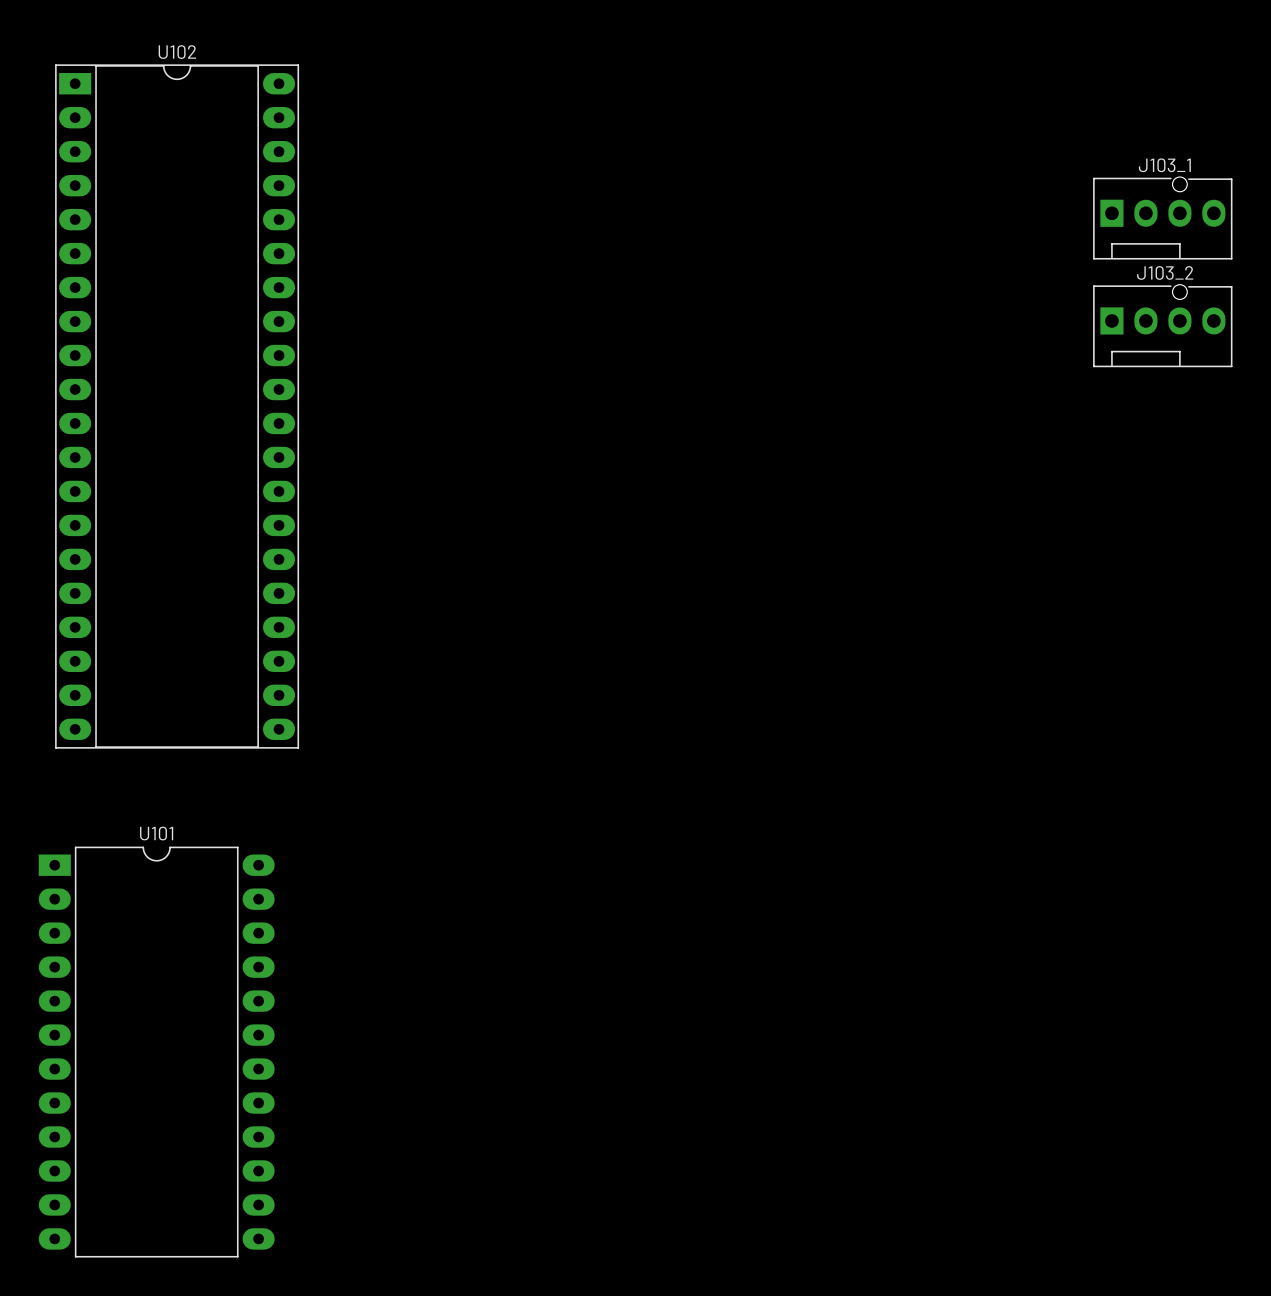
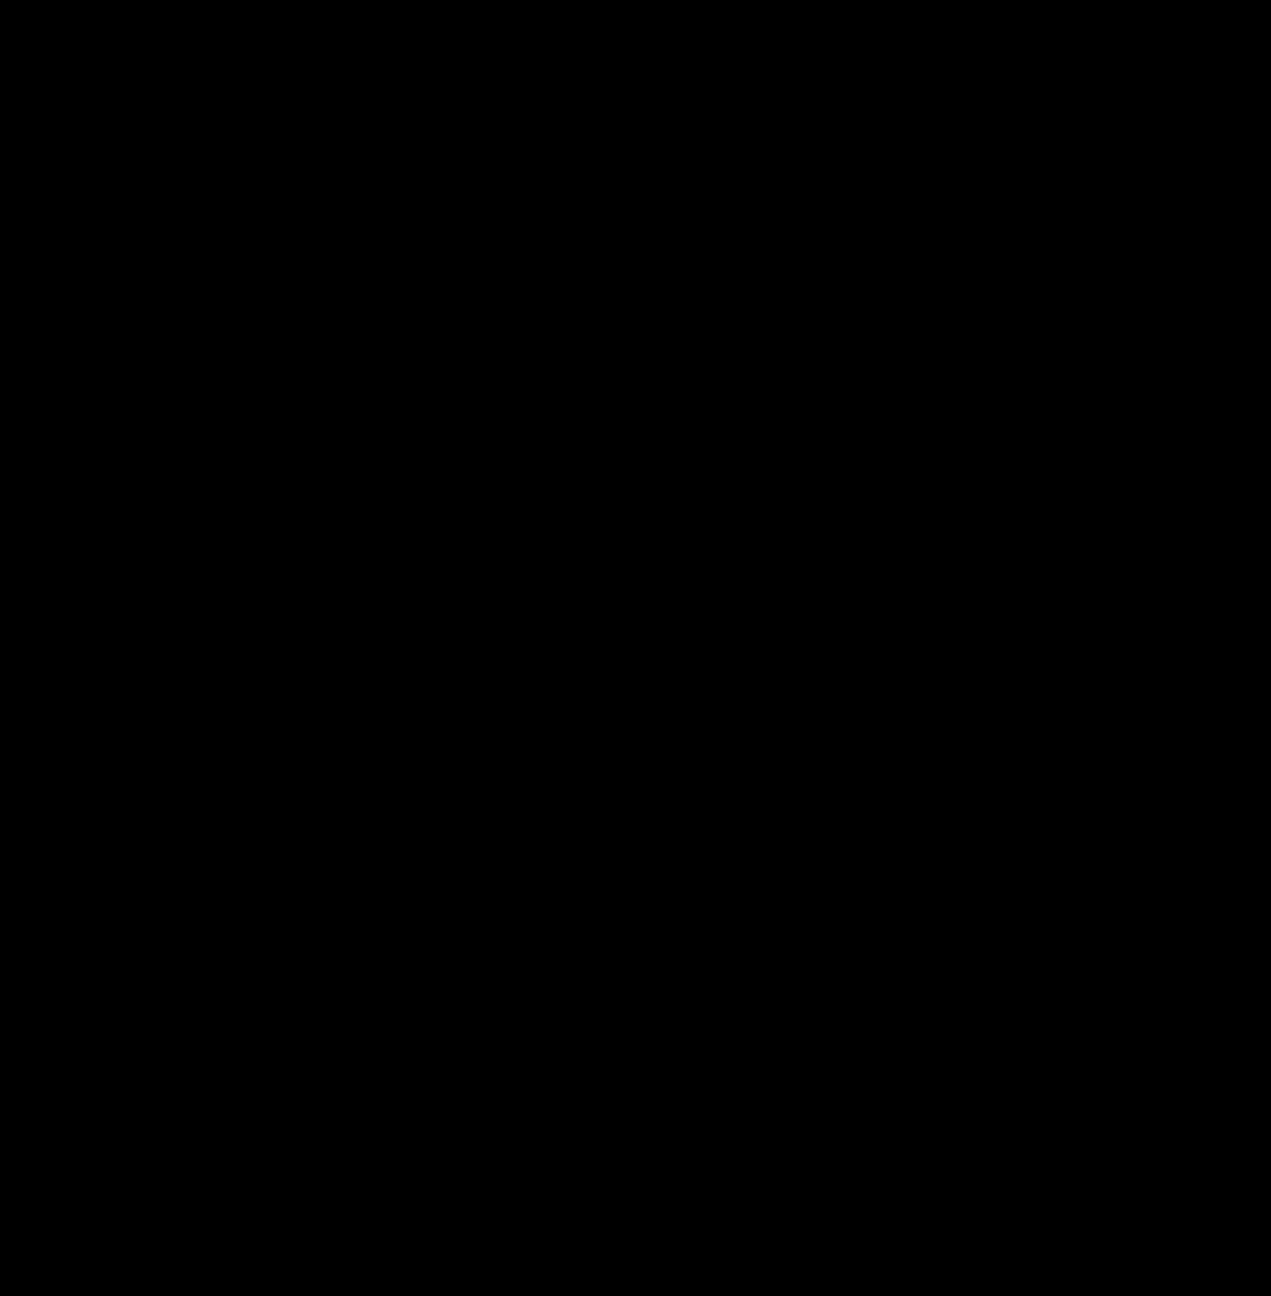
J103_1: (1162, 218) -> none
J103_2: (1162, 325) -> none
U102: (177, 406) -> none
U101: (156, 1052) -> none

